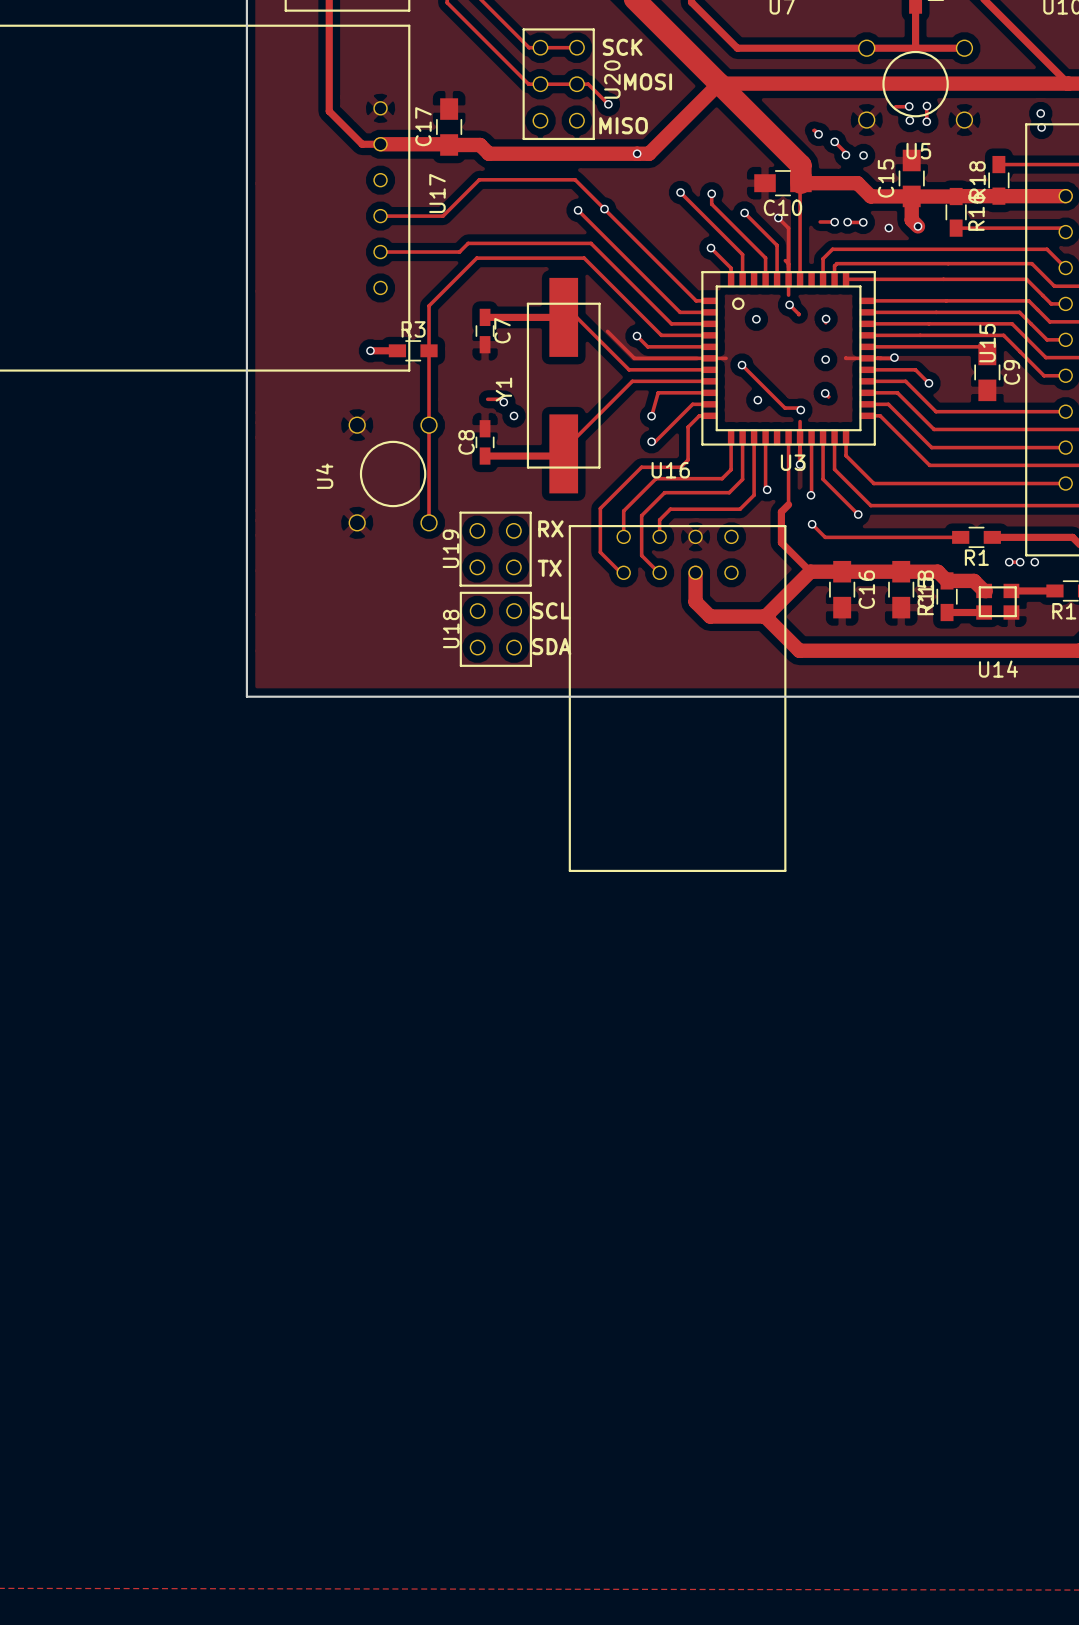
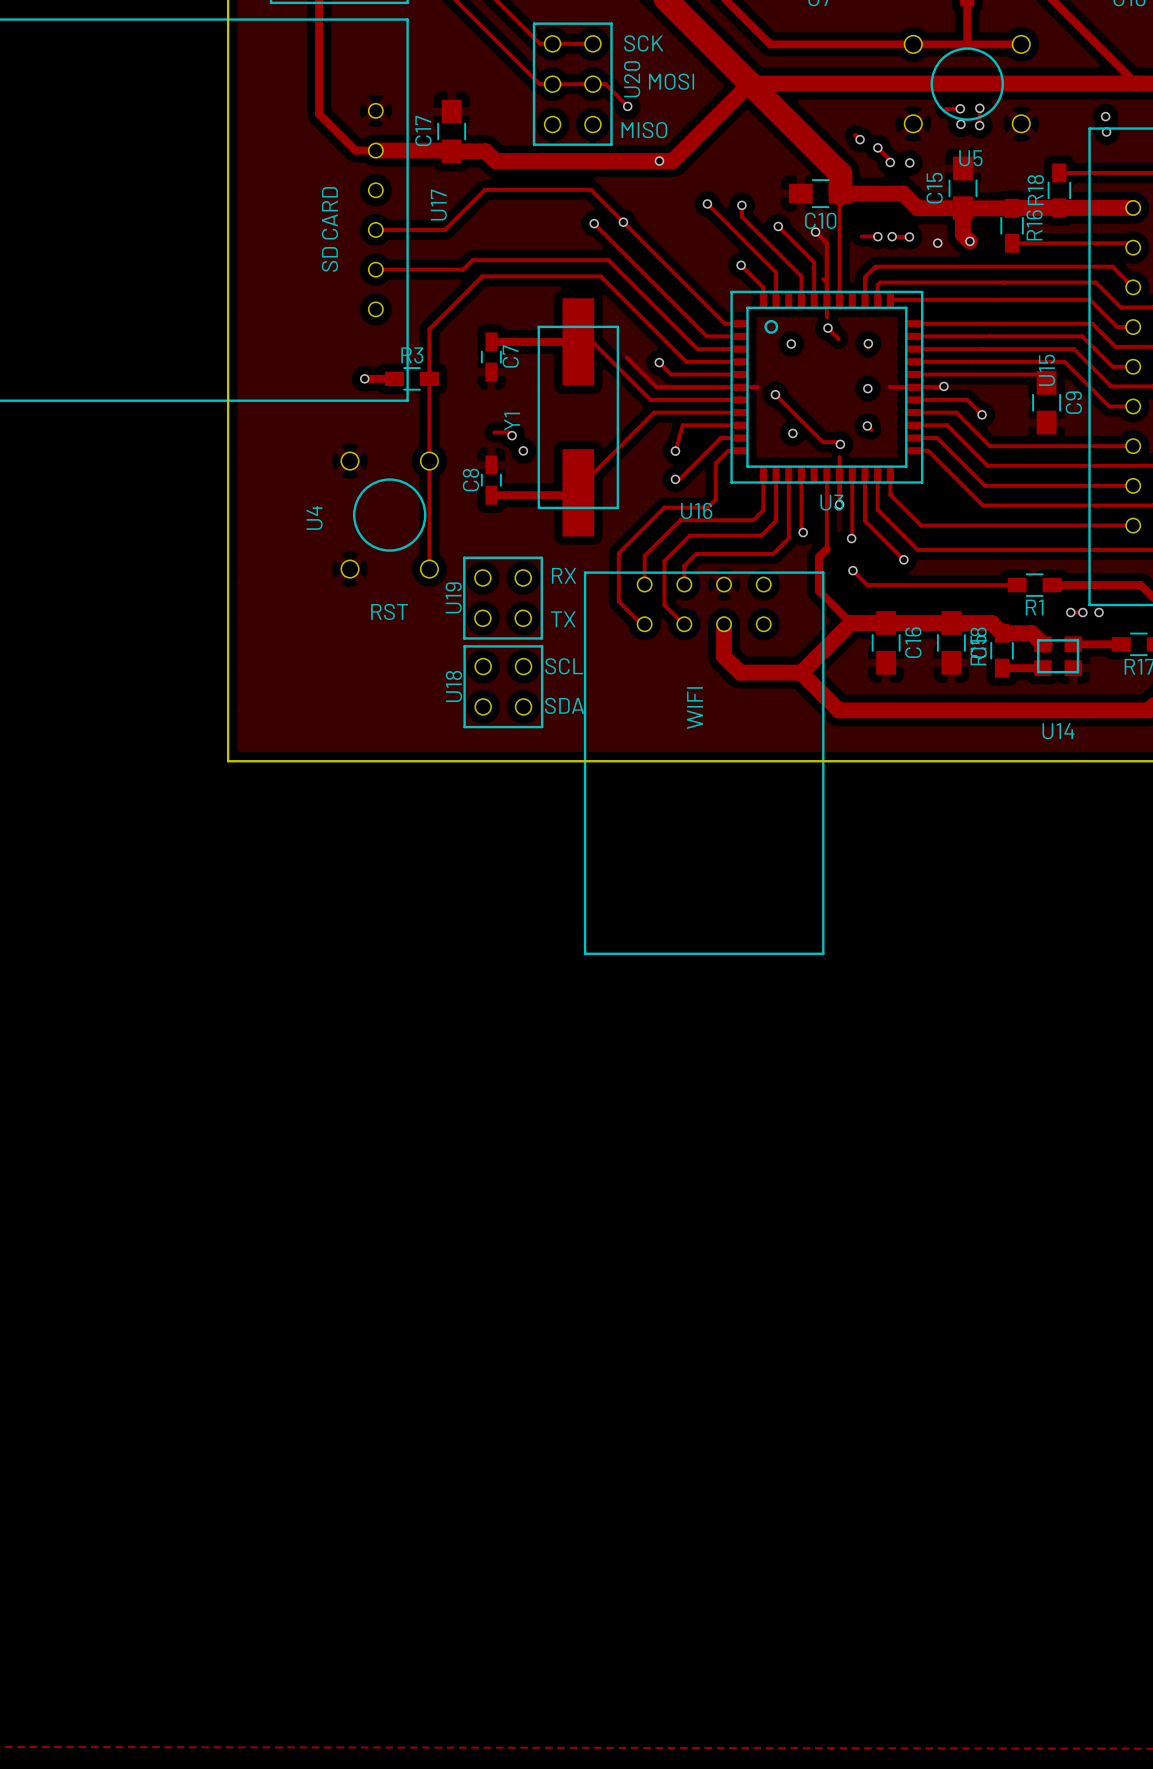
text: none -> SD CARD (329, 229)
text: none -> RST (389, 611)
text: none -> WIFI (695, 708)

